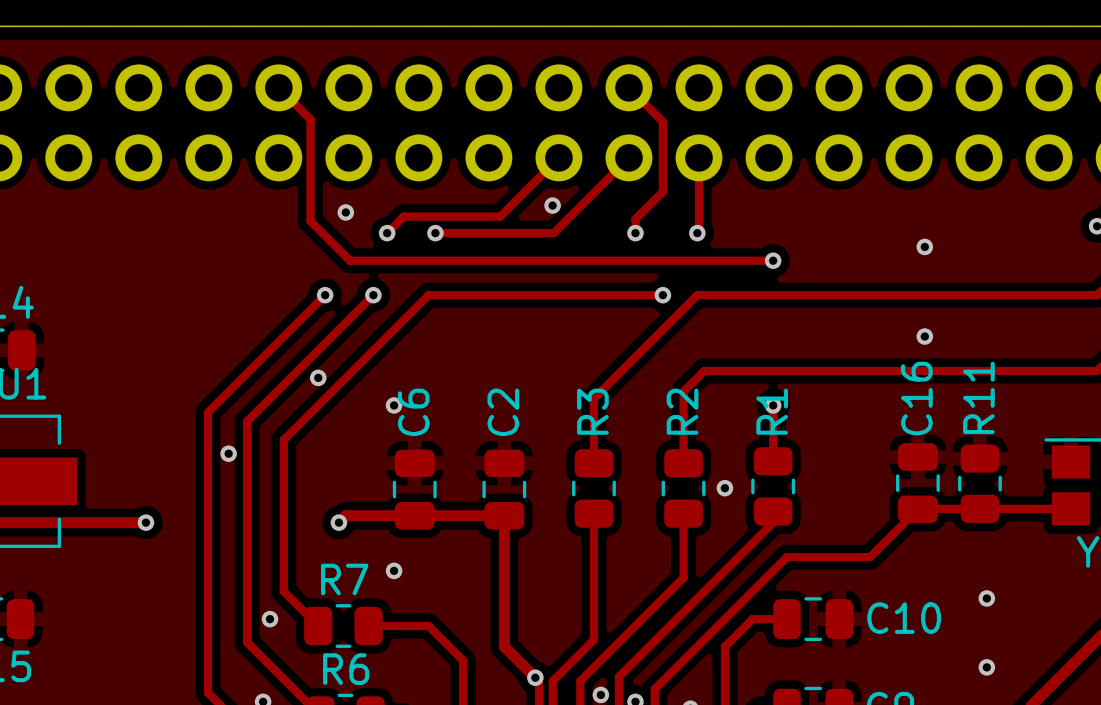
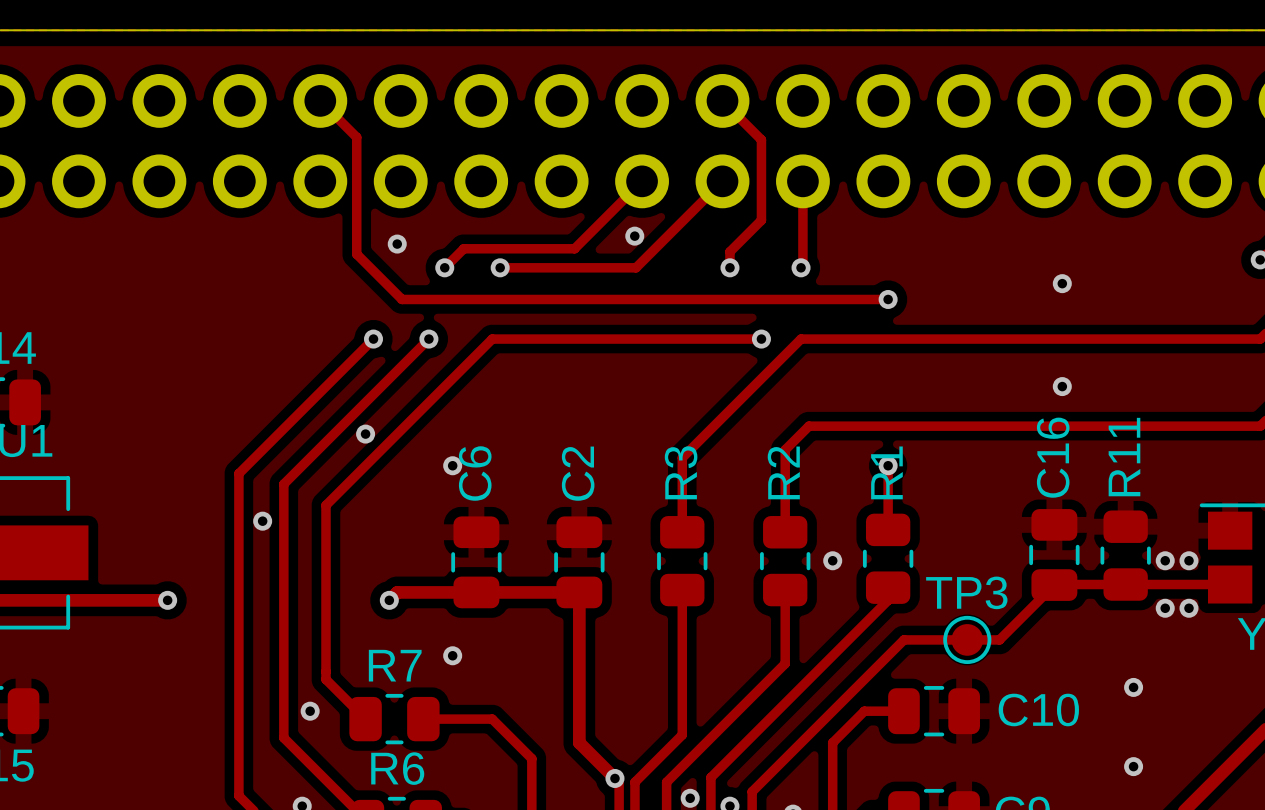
via: none -> (1165, 560)
via: none -> (1188, 560)
via: none -> (1165, 608)
via: none -> (1188, 608)
TP3: none -> (967, 639)

